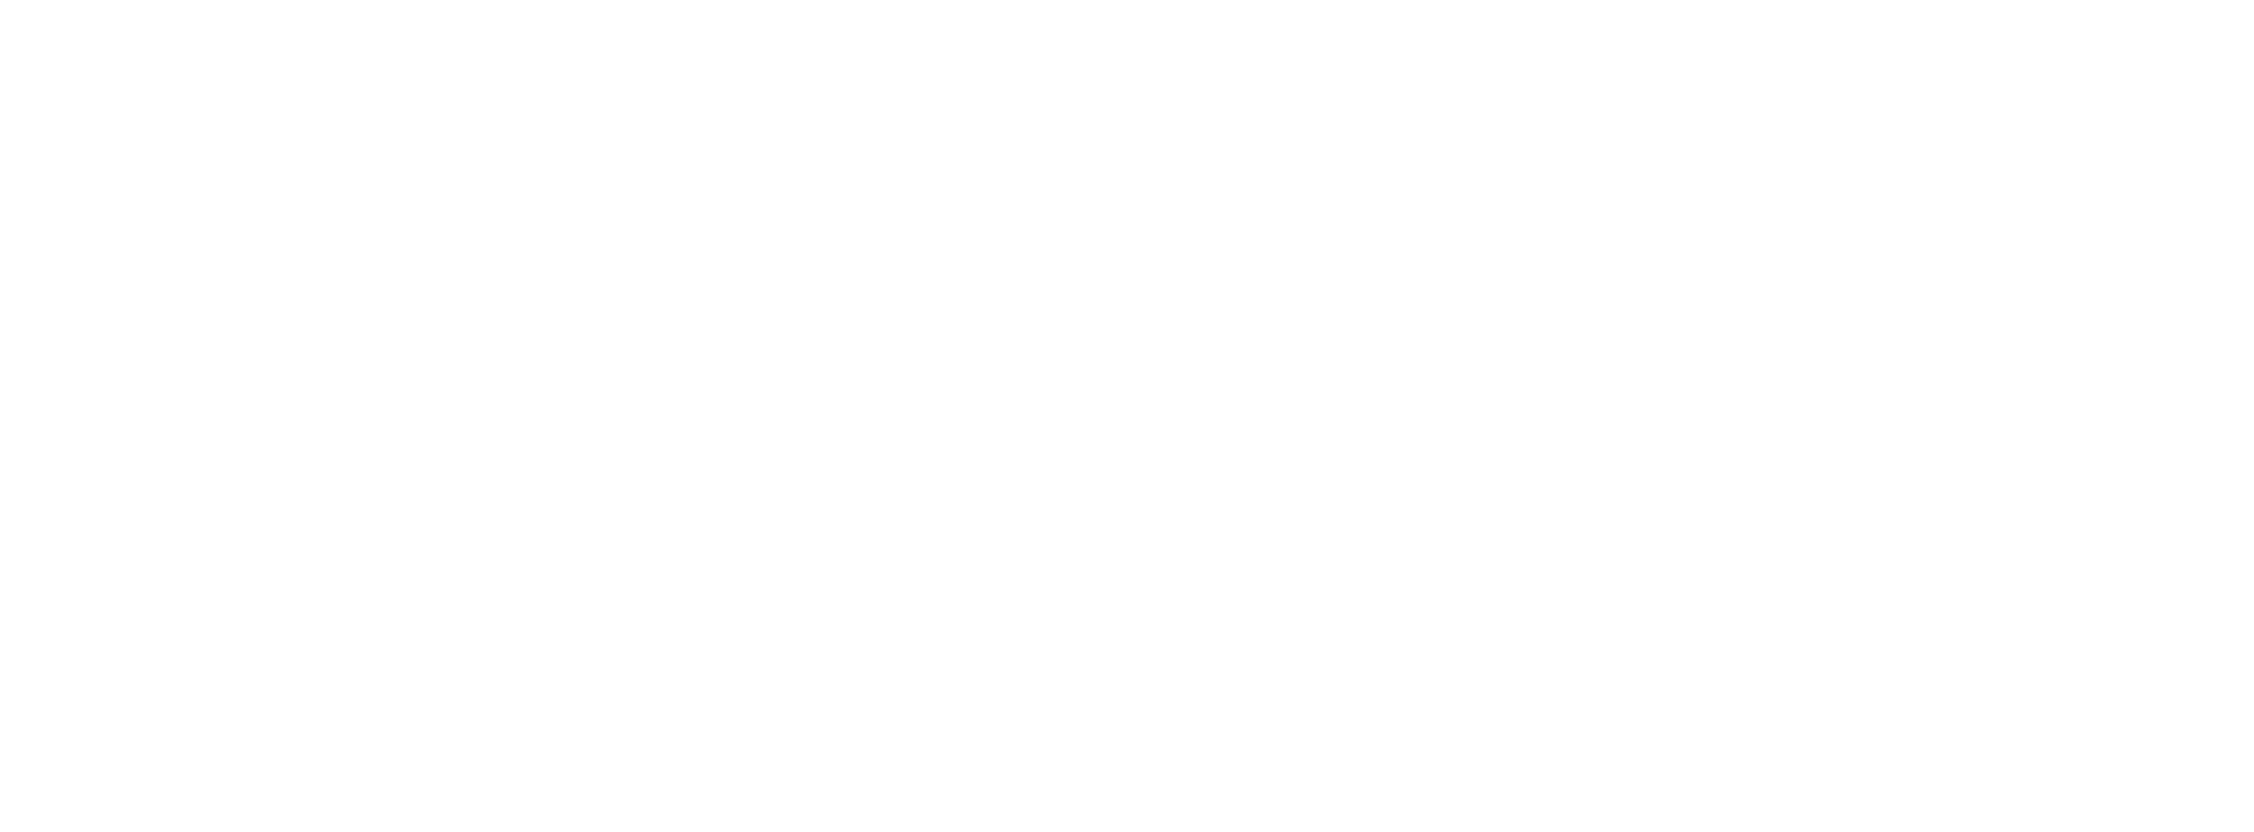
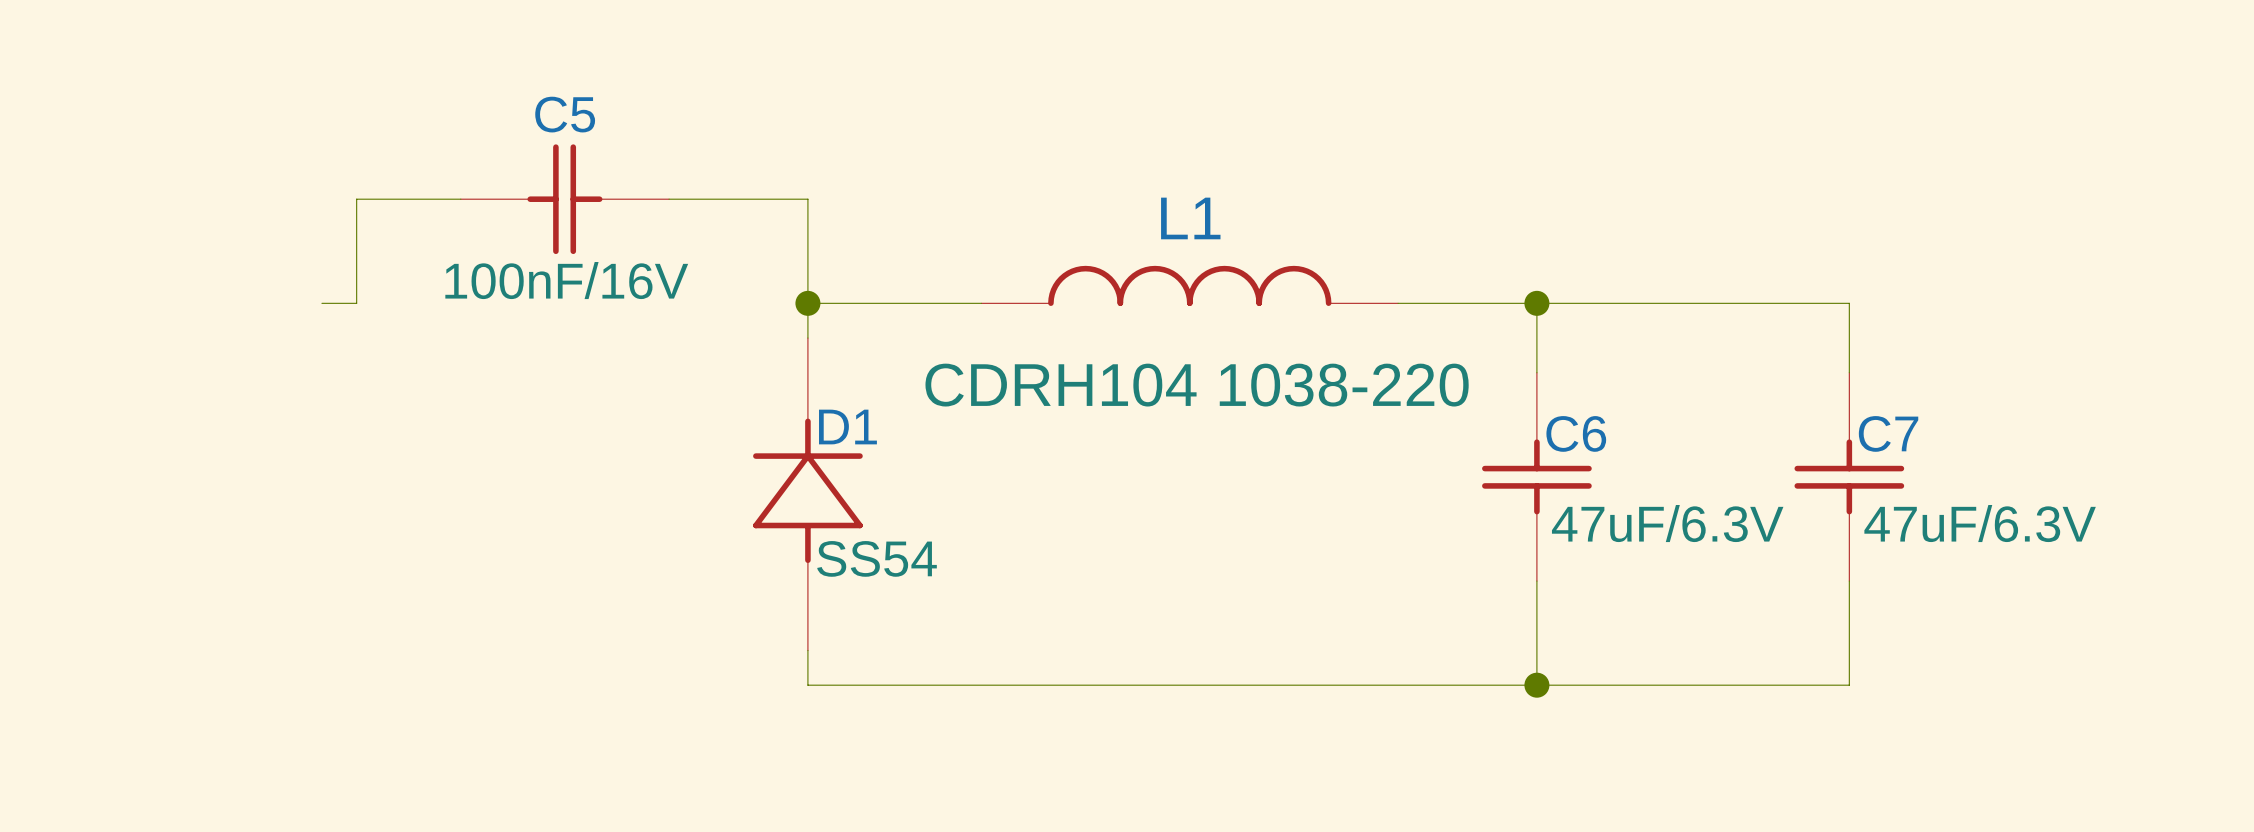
wire: none -> (460, 199) (356, 199) (356, 303) (321, 303)
C5: none -> 100nF/16V (564, 199)
wire: none -> (669, 199) (807, 199) (807, 338)
L1: none -> CDRH104 1038-220 (1189, 285)
wire: none -> (807, 303) (981, 303)
junction: none -> (807, 303)
wire: none -> (1398, 303) (1849, 303) (1849, 372)
wire: none -> (1536, 303) (1536, 372)
junction: none -> (1536, 303)
C6: none -> 47uF/6.3V (1536, 476)
C7: none -> 47uF/6.3V (1849, 476)
D1: none -> SS54 (807, 494)
wire: none -> (1536, 581) (1536, 685)
wire: none -> (1849, 581) (1849, 685) (807, 685) (807, 650)
junction: none -> (1536, 685)

